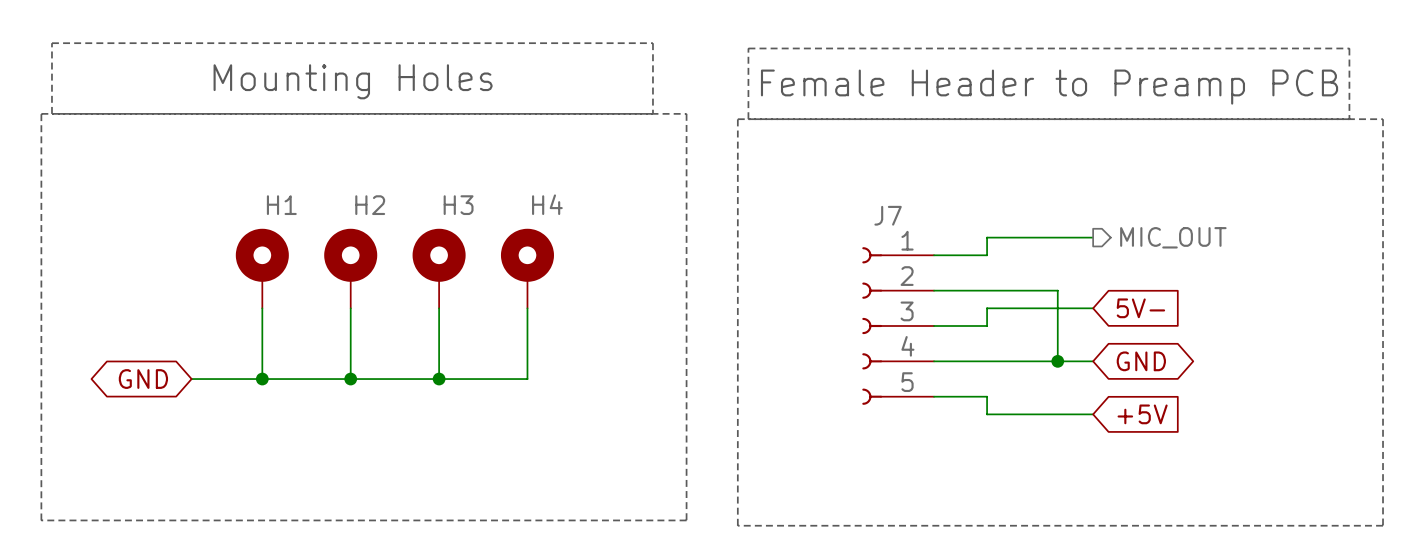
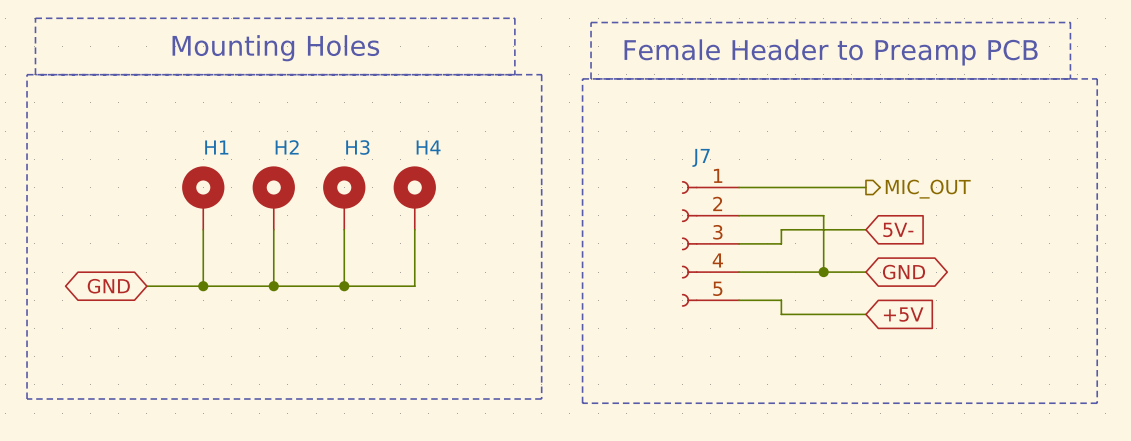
wire: (1093, 237) (987, 237) (987, 255) -> (865, 187) (781, 187)
hierarchical label position: MIC_OUT (1173, 237) -> MIC_OUT (928, 189)
wire: (1040, 290) (1057, 290) (1057, 361) -> (823, 215) (823, 272)
junction position: (1057, 361) -> (823, 272)

